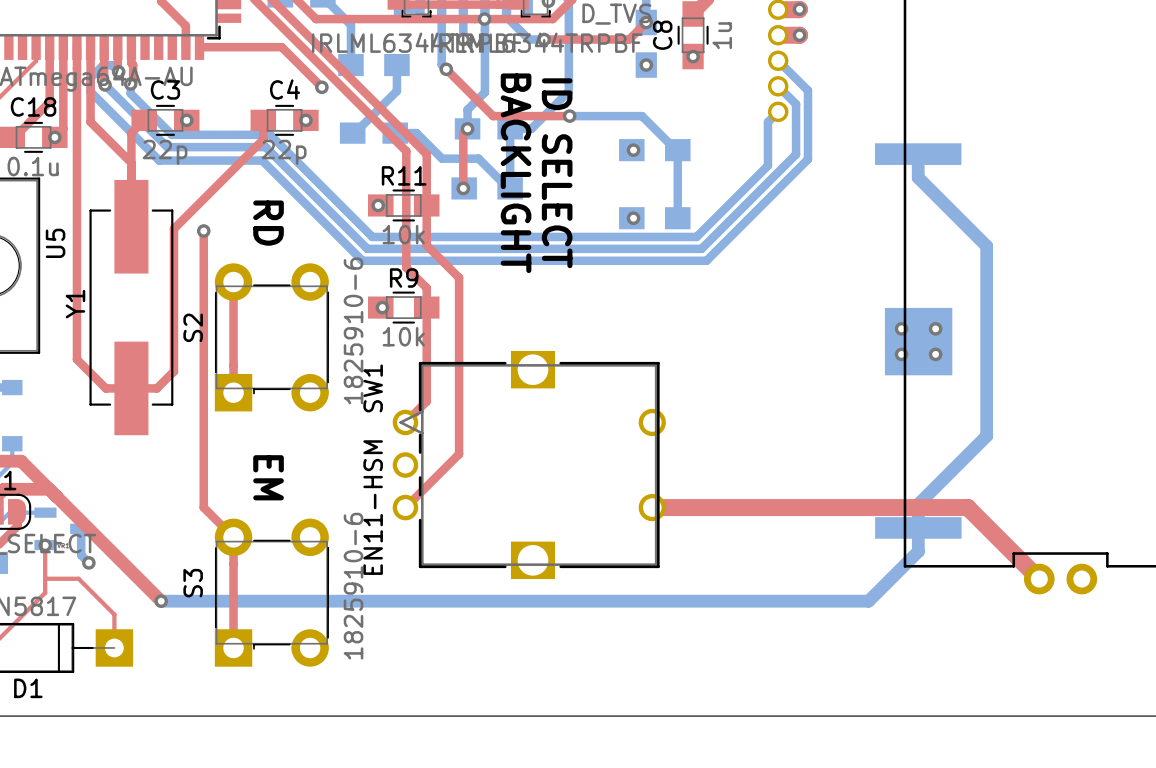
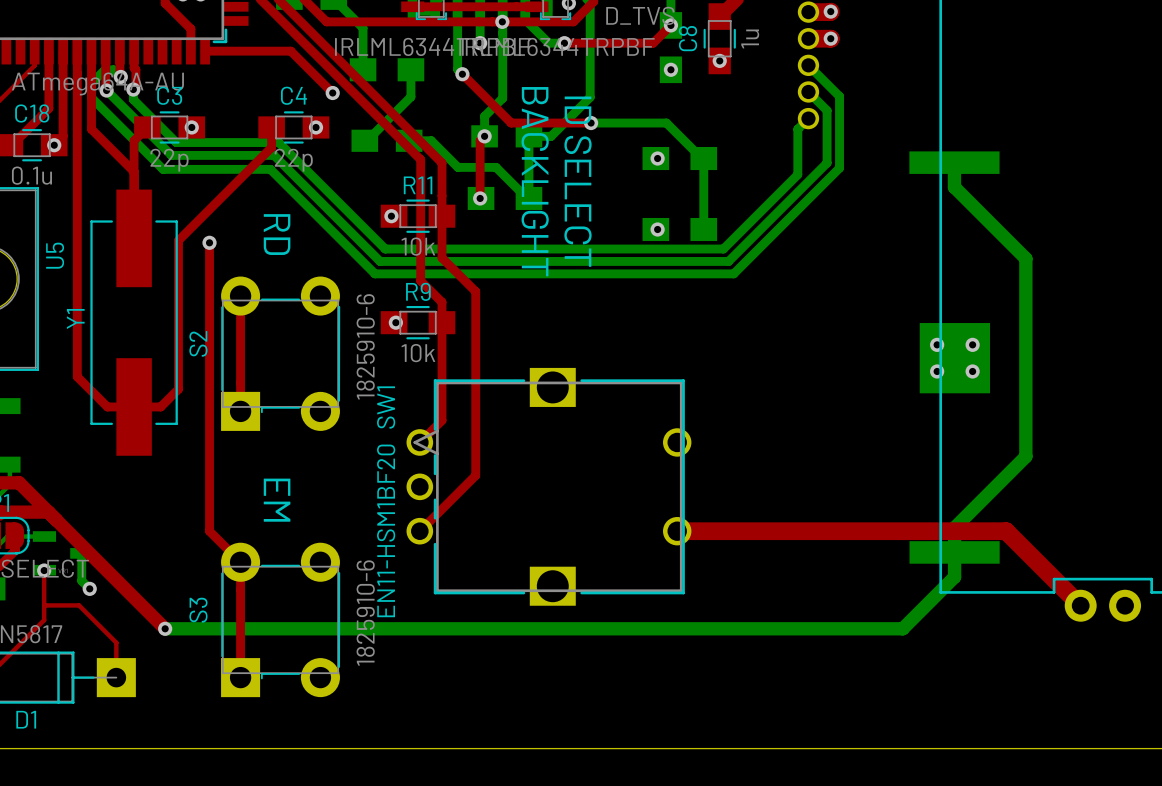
SW1 value: EN11-HSM (373, 507) -> EN11-HSM1BF20 (386, 530)

